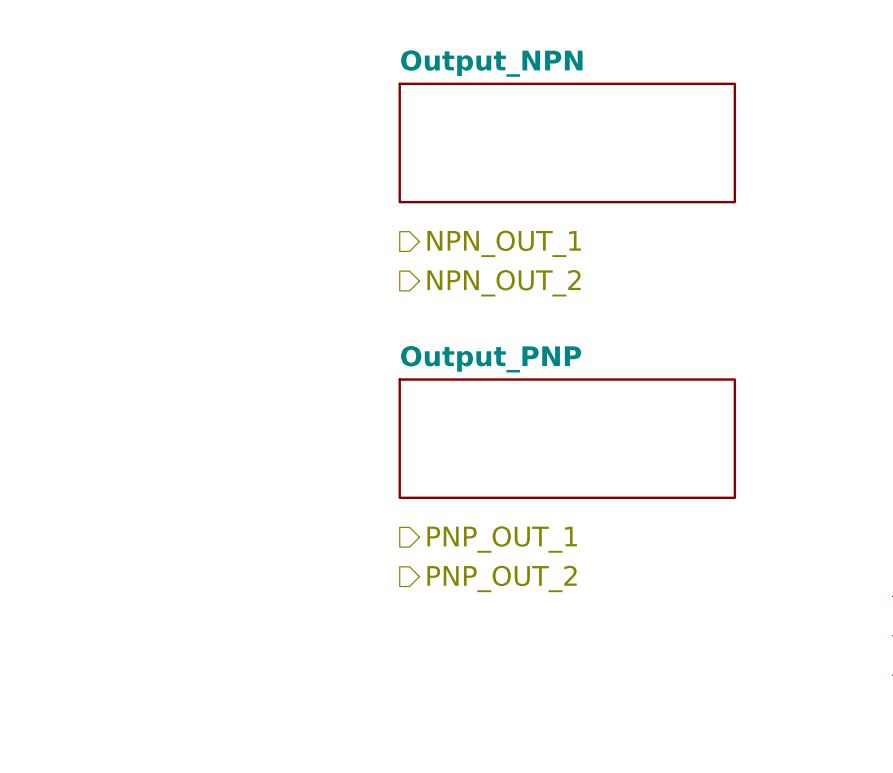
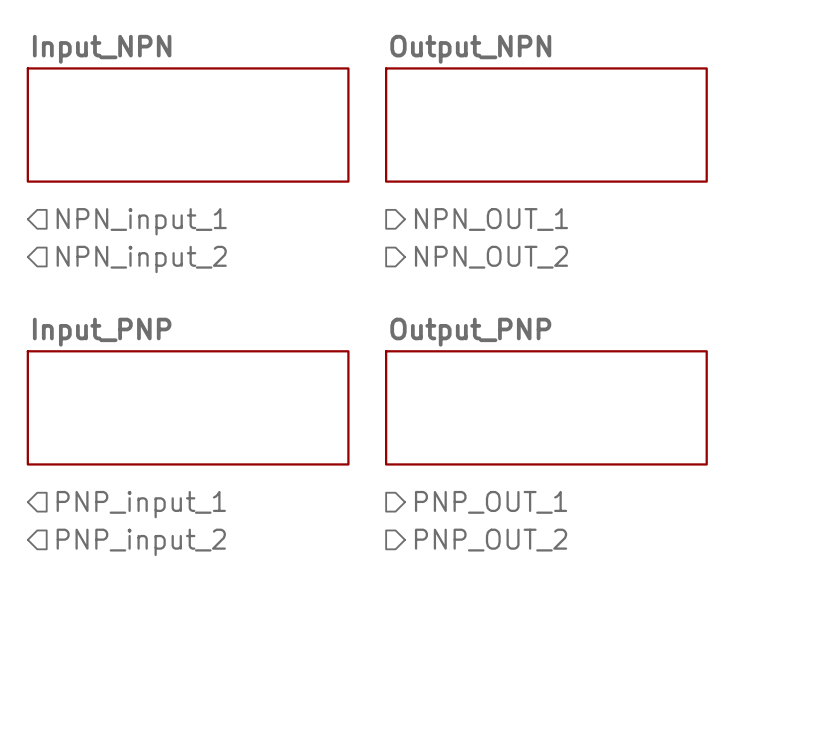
sheet Input_NPN: none -> (188, 125)
hierarchical label: none -> NPN_input_1 (141, 221)
hierarchical label: none -> NPN_input_2 (141, 259)
sheet Input_PNP: none -> (188, 407)
hierarchical label: none -> PNP_input_1 (141, 504)
hierarchical label: none -> PNP_input_2 (141, 542)

